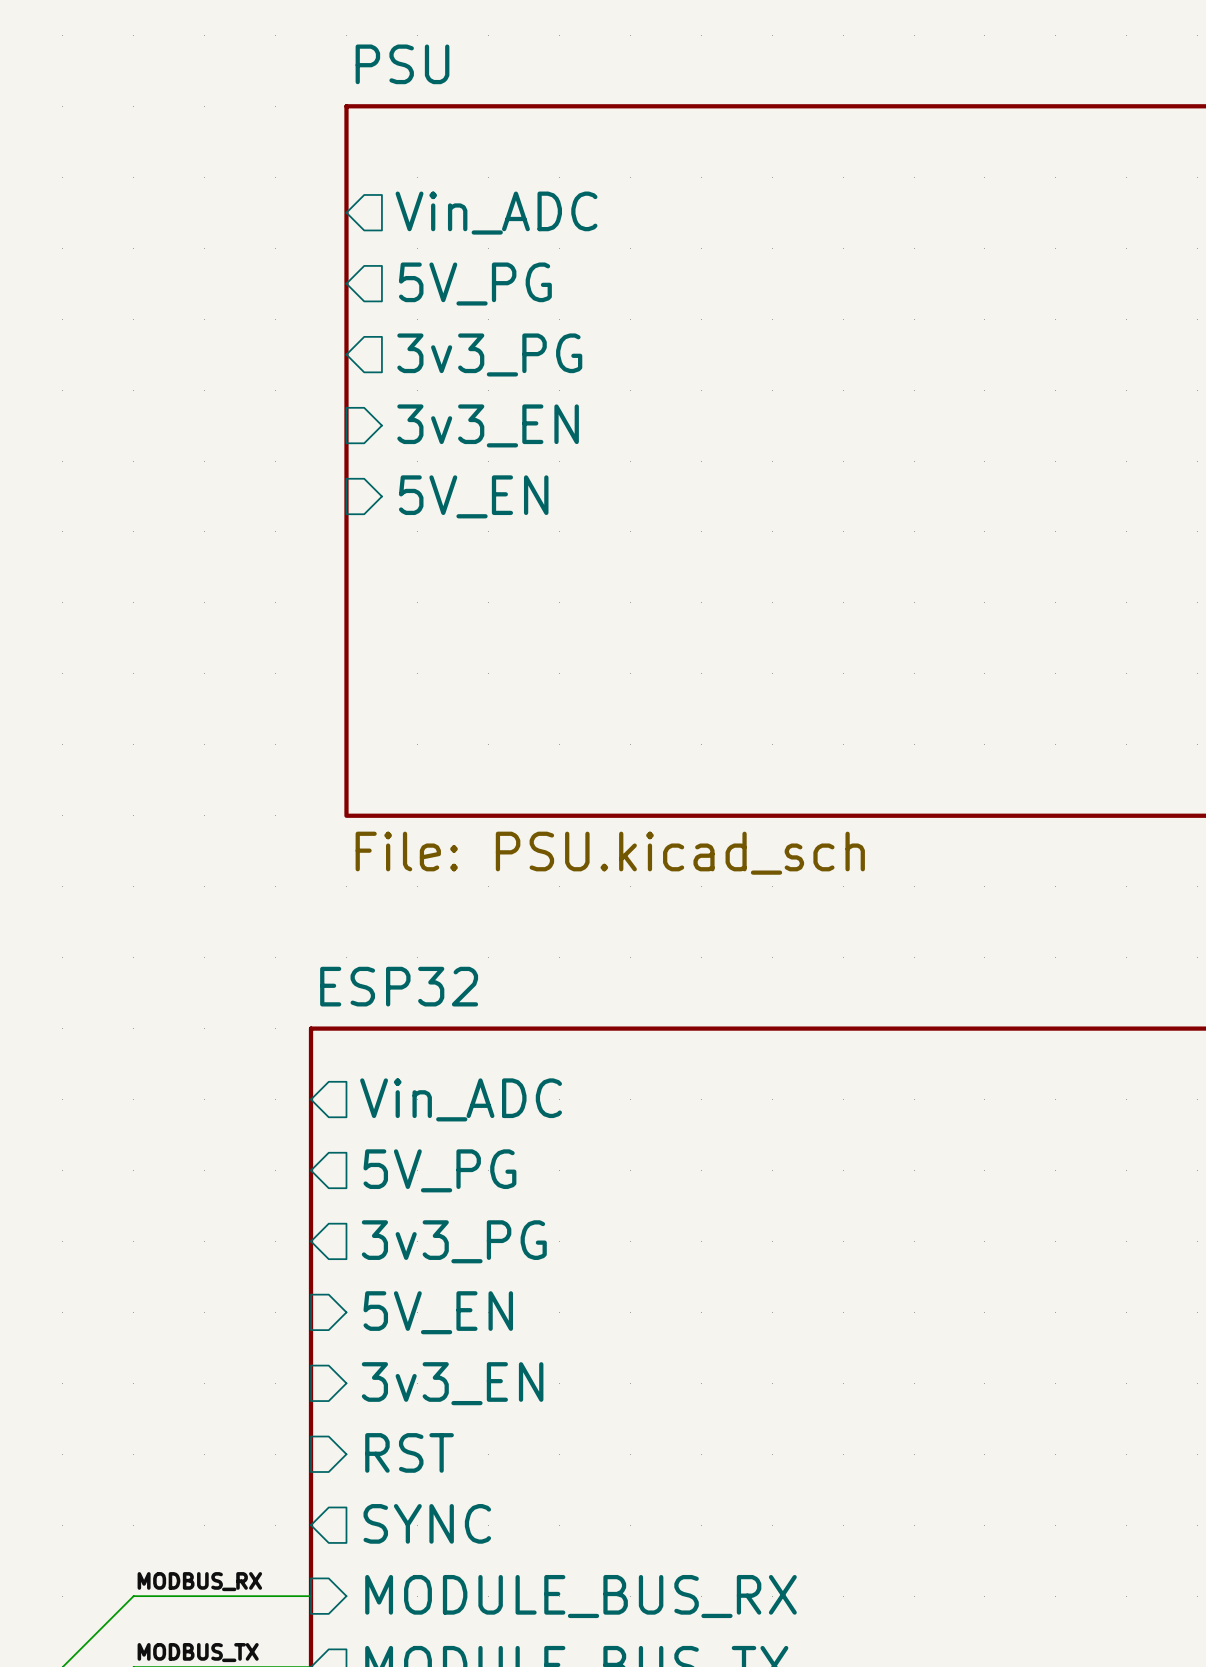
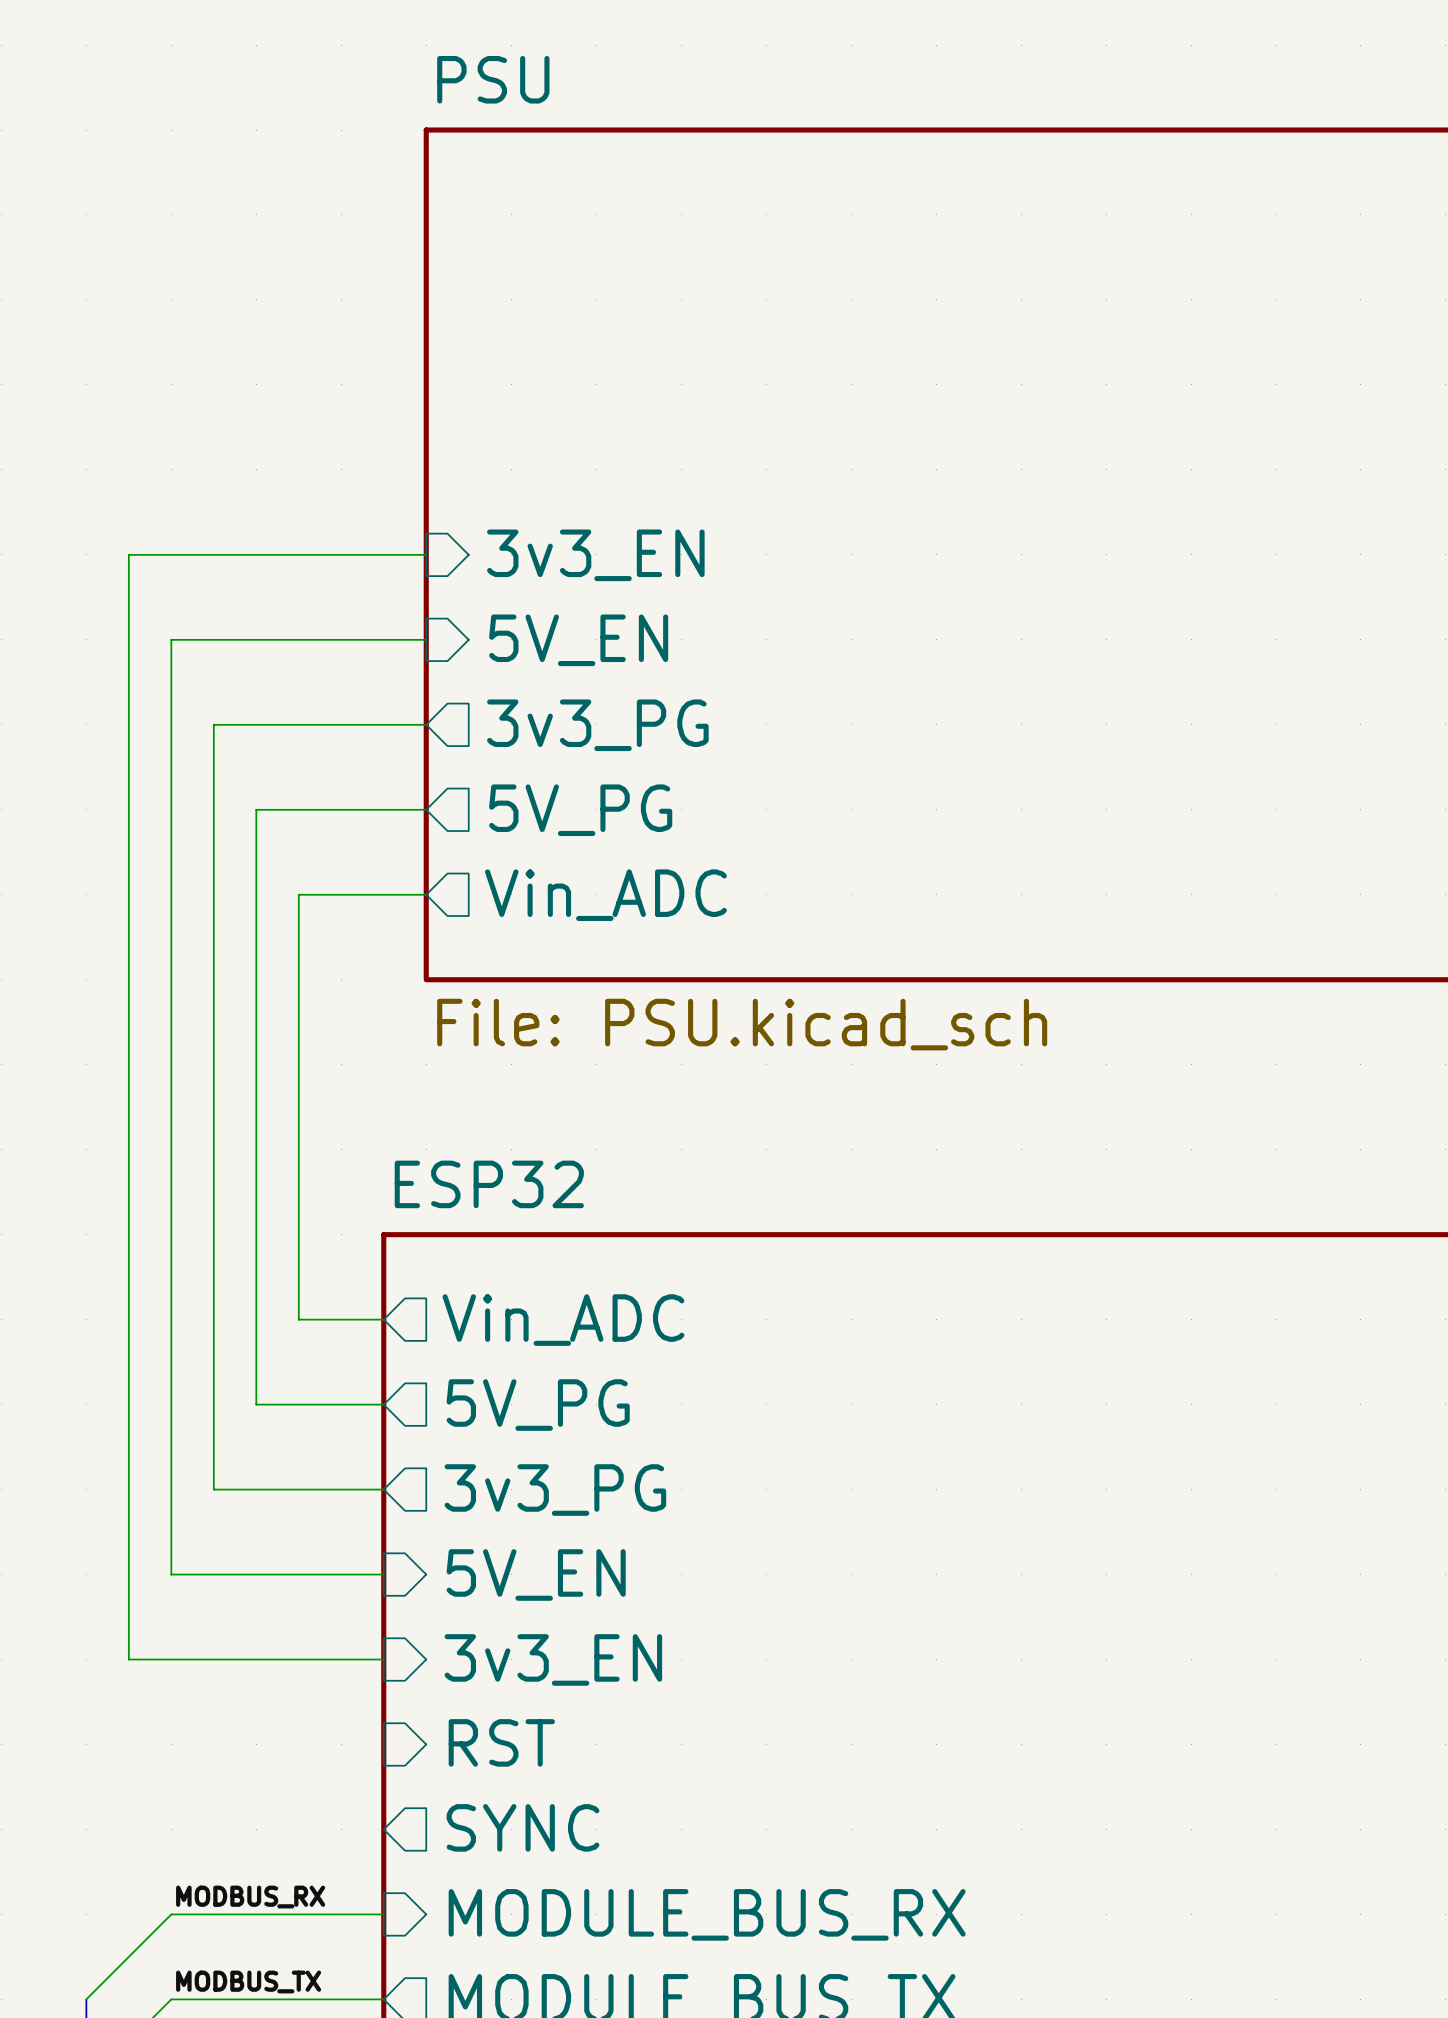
sheet pin position: Vin_ADC (496, 213) -> Vin_ADC (605, 895)
sheet pin position: 5V_PG (475, 284) -> 5V_PG (580, 810)
sheet pin position: 3v3_PG (489, 354) -> 3v3_PG (597, 725)
sheet pin position: 3v3_EN (488, 425) -> 3v3_EN (595, 555)
wire: none -> (426, 554) (128, 554) (128, 1659) (383, 1659)
sheet pin position: 5V_EN (473, 496) -> 5V_EN (578, 640)
wire: none -> (426, 639) (171, 639) (171, 1574) (383, 1574)
wire: none -> (426, 724) (213, 724) (213, 1489) (383, 1489)
wire: none -> (426, 809) (256, 809) (256, 1404) (383, 1404)
wire: none -> (426, 894) (298, 894) (298, 1319) (383, 1319)

